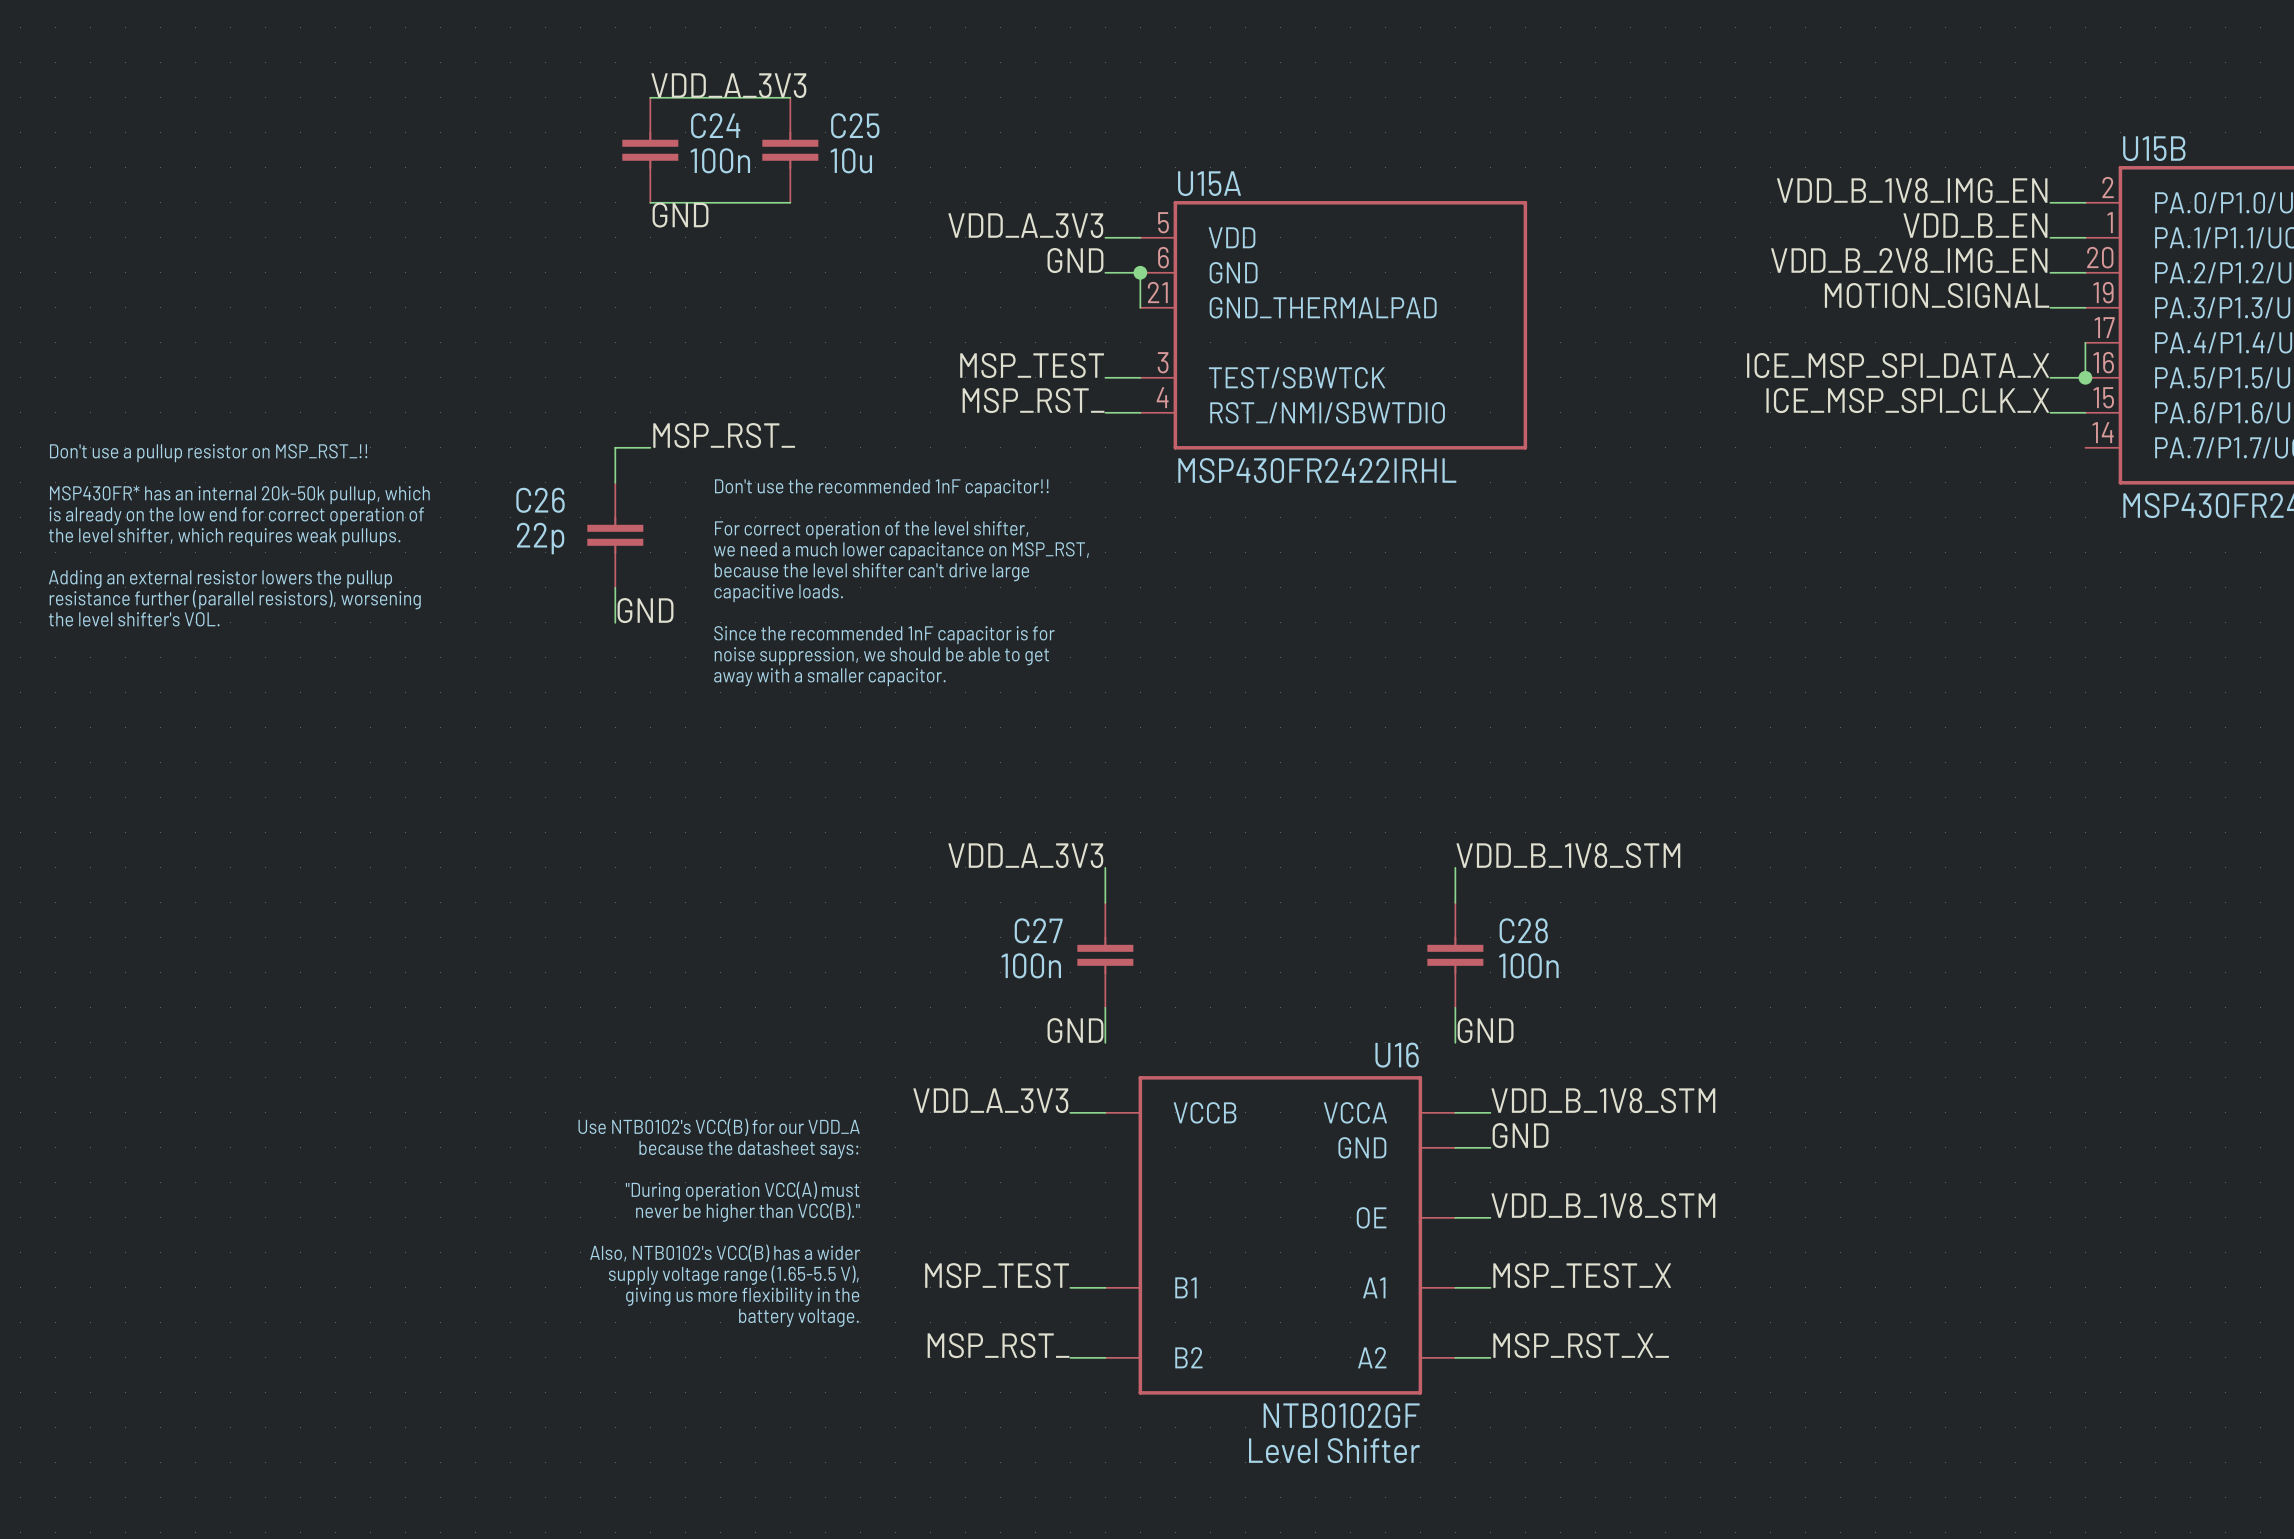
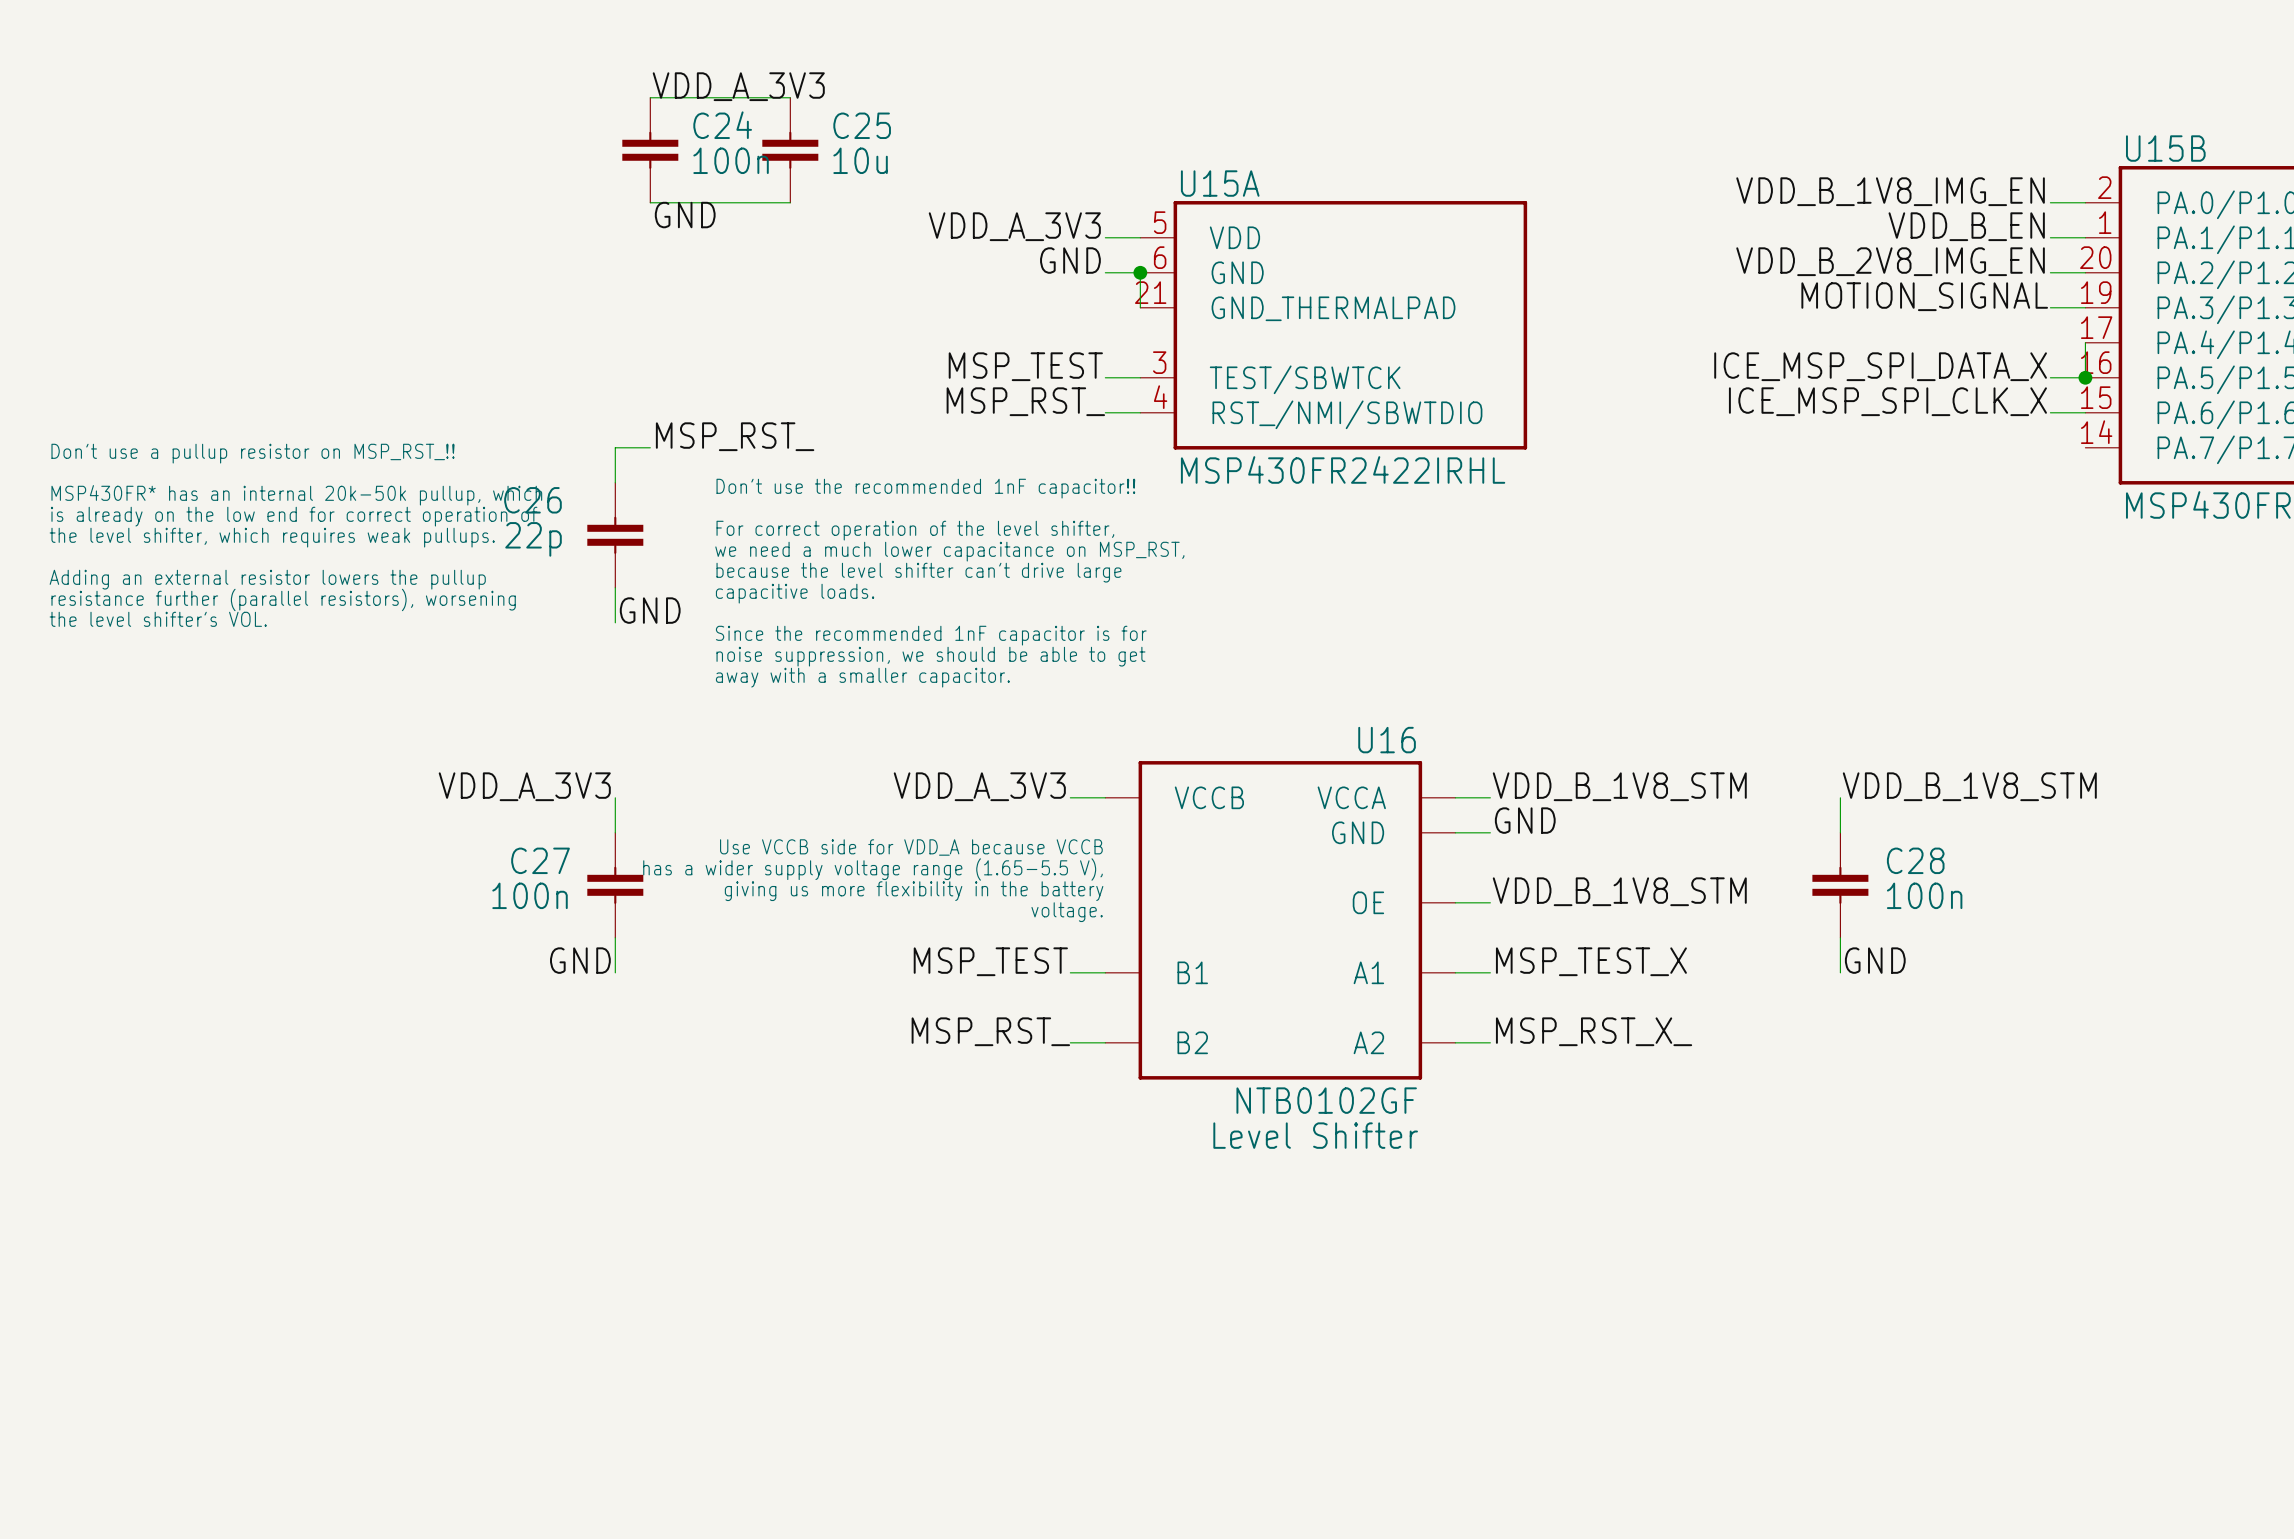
label: none -> VDD_A_3V3 (524, 786)
label: none -> VDD_B_1V8_STM (1619, 786)
label: none -> VDD_B_1V8_STM (1969, 786)
wire: none -> (615, 797) (615, 832)
wire: none -> (1840, 797) (1840, 832)
label: none -> GND (1525, 820)
text: none -> Use VCCB side for VDD_A because VCCB (911, 847)
label position: VDD_A_3V3 (1025, 855) -> VDD_A_3V3 (979, 786)
label position: VDD_B_1V8_STM (1568, 855) -> VDD_B_1V8_STM (1619, 891)
wire: (1105, 867) (1105, 902) -> none
wire: (1455, 867) (1455, 902) -> (1490, 902) (1455, 902)
text: none -> has a wider supply voltage range (1.65-5.5 V), (872, 869)
text: none -> giving us more flexibility in the battery (914, 891)
text: none -> voltage. (1067, 912)
wire: none -> (615, 937) (615, 972)
wire: none -> (1840, 937) (1840, 972)
C27 position: (1105, 955) -> (615, 885)
C28 position: (1455, 955) -> (1840, 885)
label: none -> GND (580, 960)
label: none -> GND (1875, 960)
wire: (1105, 1007) (1105, 1042) -> (1070, 1042) (1105, 1042)
wire: (1455, 1007) (1455, 1042) -> (1490, 1042) (1455, 1042)
label: GND (1075, 1030) -> none
label: GND (1485, 1030) -> none
label: VDD_A_3V3 (990, 1100) -> none
label: VDD_B_1V8_STM (1603, 1100) -> none
wire: (1070, 1112) (1105, 1112) -> (1070, 797) (1105, 797)
wire: (1455, 1112) (1490, 1112) -> (1455, 797) (1490, 797)
text: Use NTB0102's VCC(B) for our VDD_A (719, 1127) -> none
label: GND (1520, 1135) -> none
wire: (1455, 1147) (1490, 1147) -> (1455, 832) (1490, 832)
text: because the datasheet says: (748, 1149) -> none
text: "During operation VCC(A) must (742, 1191) -> none
label: VDD_B_1V8_STM (1603, 1205) -> none
text: never be higher than VCC(B)." (747, 1212) -> none
wire: (1455, 1217) (1490, 1217) -> none
U16 position: (1280, 1235) -> (1280, 920)
text: Also, NTB0102's VCC(B) has a wider (725, 1253) -> none
text: supply voltage range (1.65-5.5 V), (733, 1275) -> none
label position: MSP_TEST (997, 1275) -> MSP_TEST (990, 961)
label position: MSP_TEST_X (1582, 1275) -> MSP_TEST_X (1591, 961)
wire: (1070, 1287) (1105, 1287) -> (1070, 972) (1105, 972)
wire: (1455, 1287) (1490, 1287) -> (1455, 972) (1490, 972)
text: giving us more flexibility in the (742, 1296) -> none
text: battery voltage. (798, 1317) -> none
label position: MSP_RST_ (998, 1345) -> MSP_RST_ (990, 1031)
label position: MSP_RST_X_ (1581, 1345) -> MSP_RST_X_ (1594, 1031)
wire: (1070, 1357) (1105, 1357) -> none
wire: (1455, 1357) (1490, 1357) -> none

